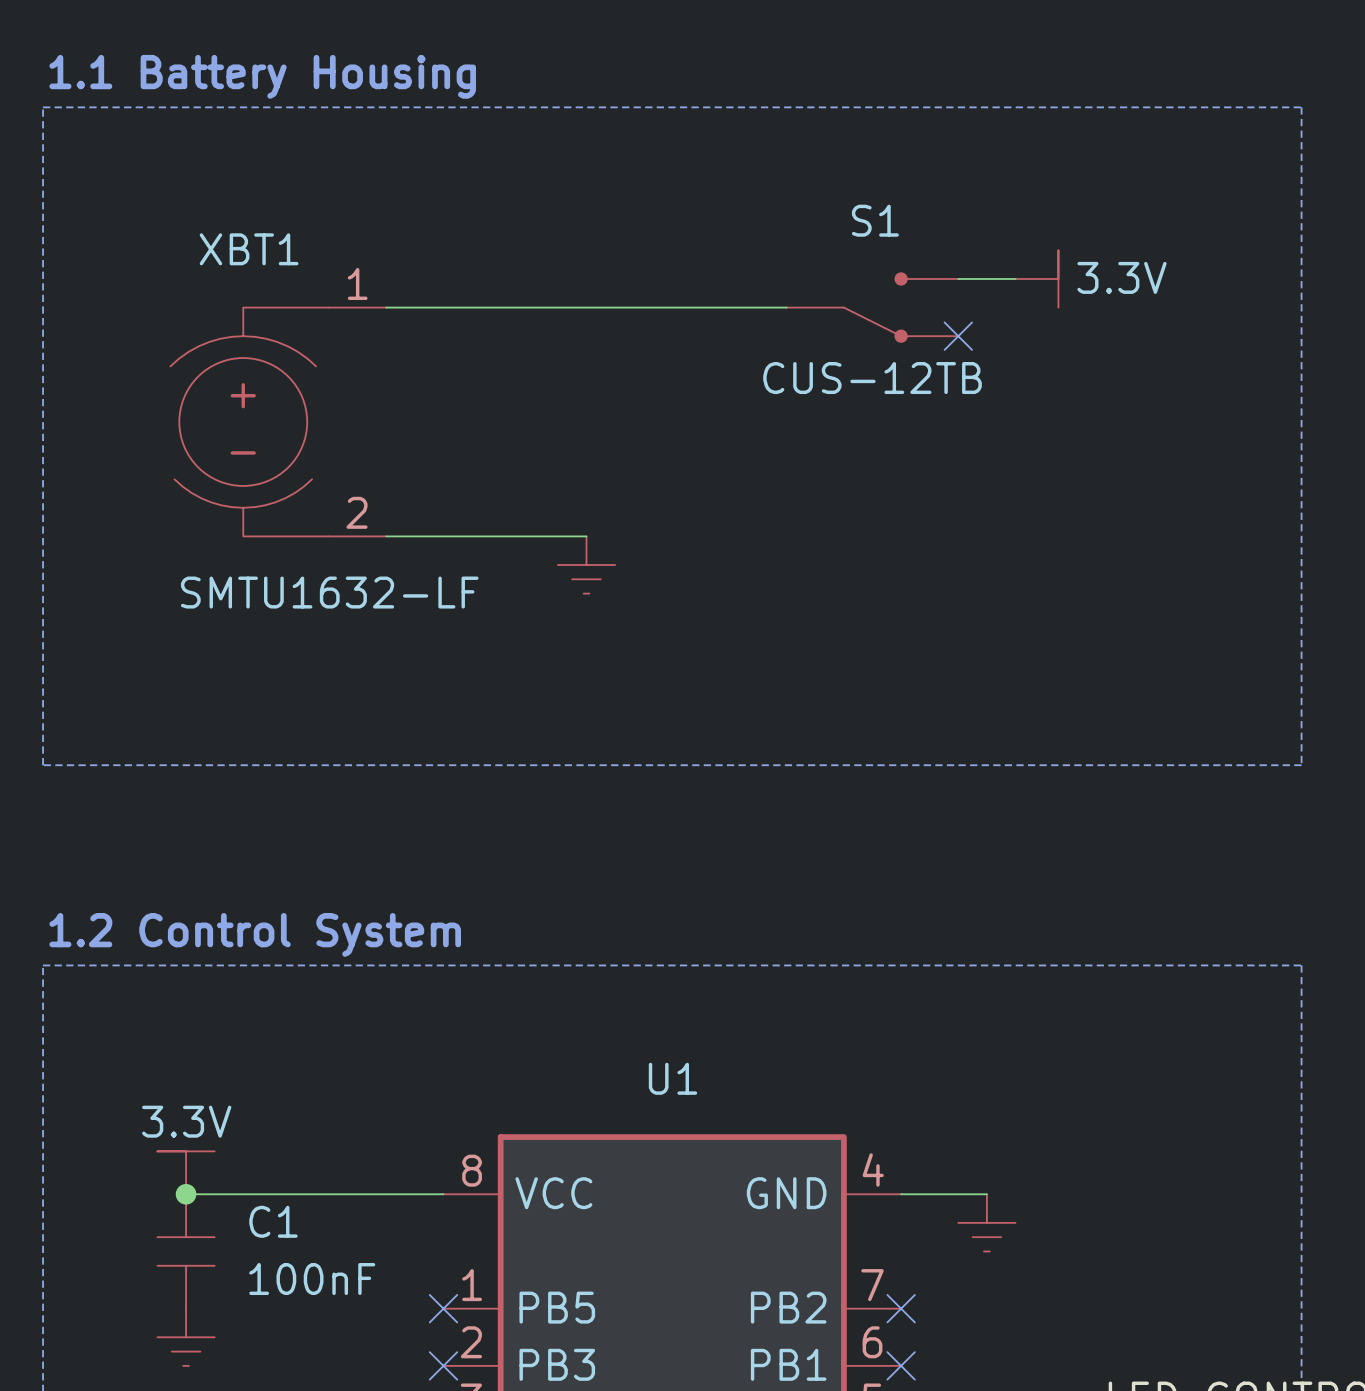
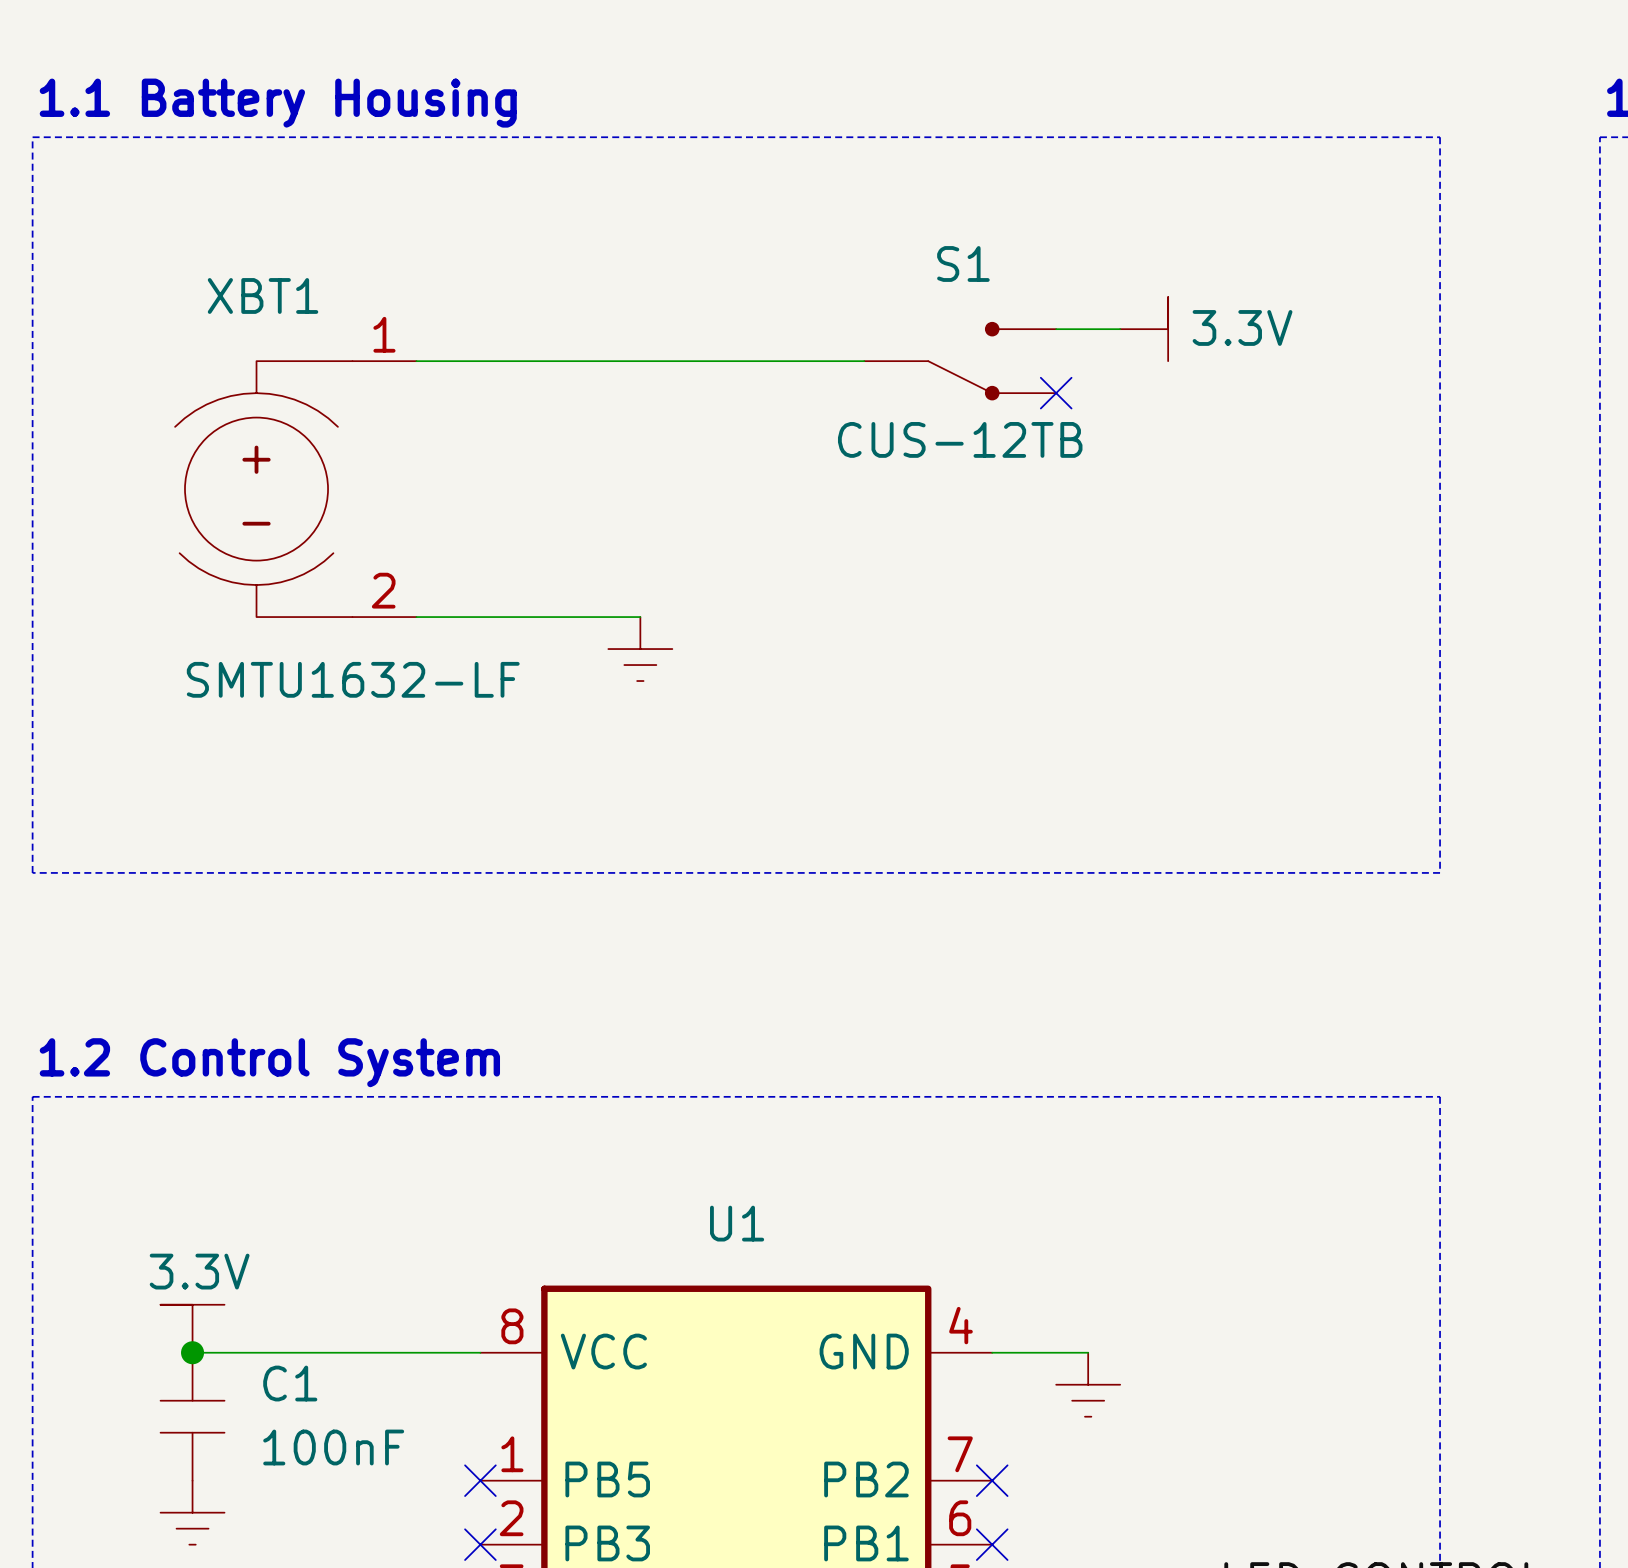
power symbol text position: 3.3V (1121, 277) -> 3.3V (1242, 327)
power symbol text position: 3.3V (186, 1121) -> 3.3V (199, 1271)

